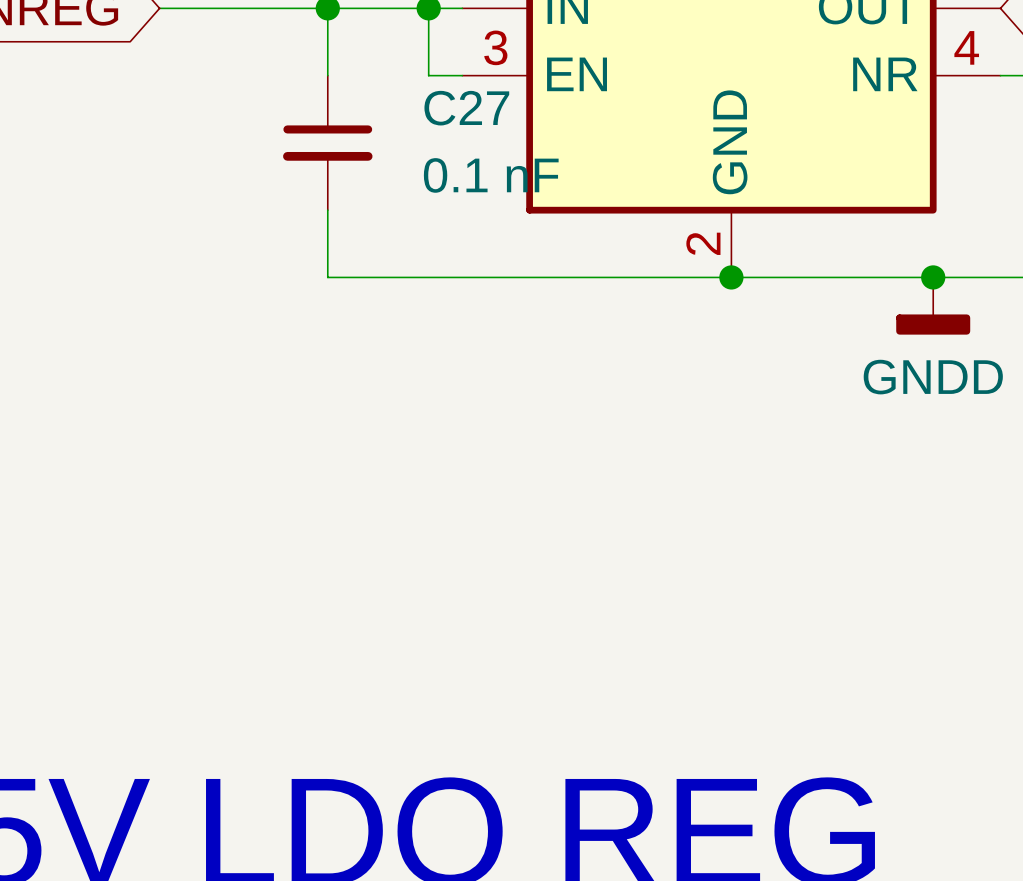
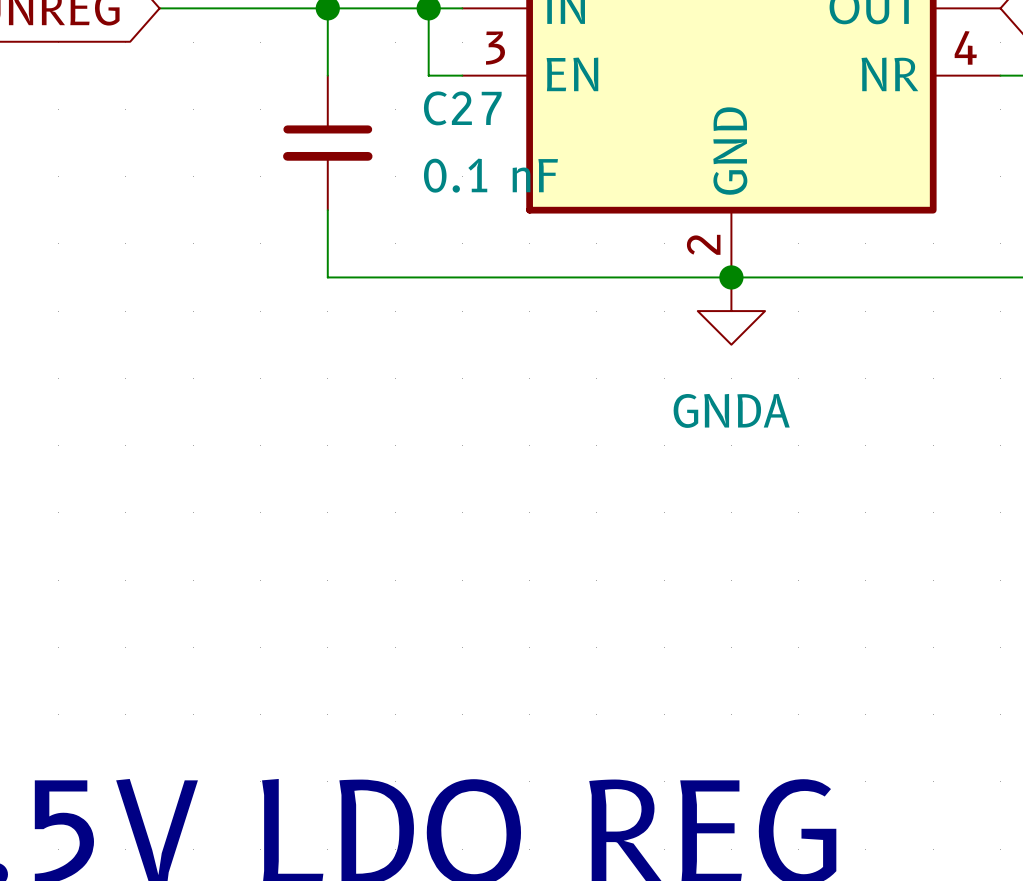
junction: (933, 277) -> none
power symbol: GNDD (933, 306) -> none
power symbol: none -> GNDA (731, 311)

